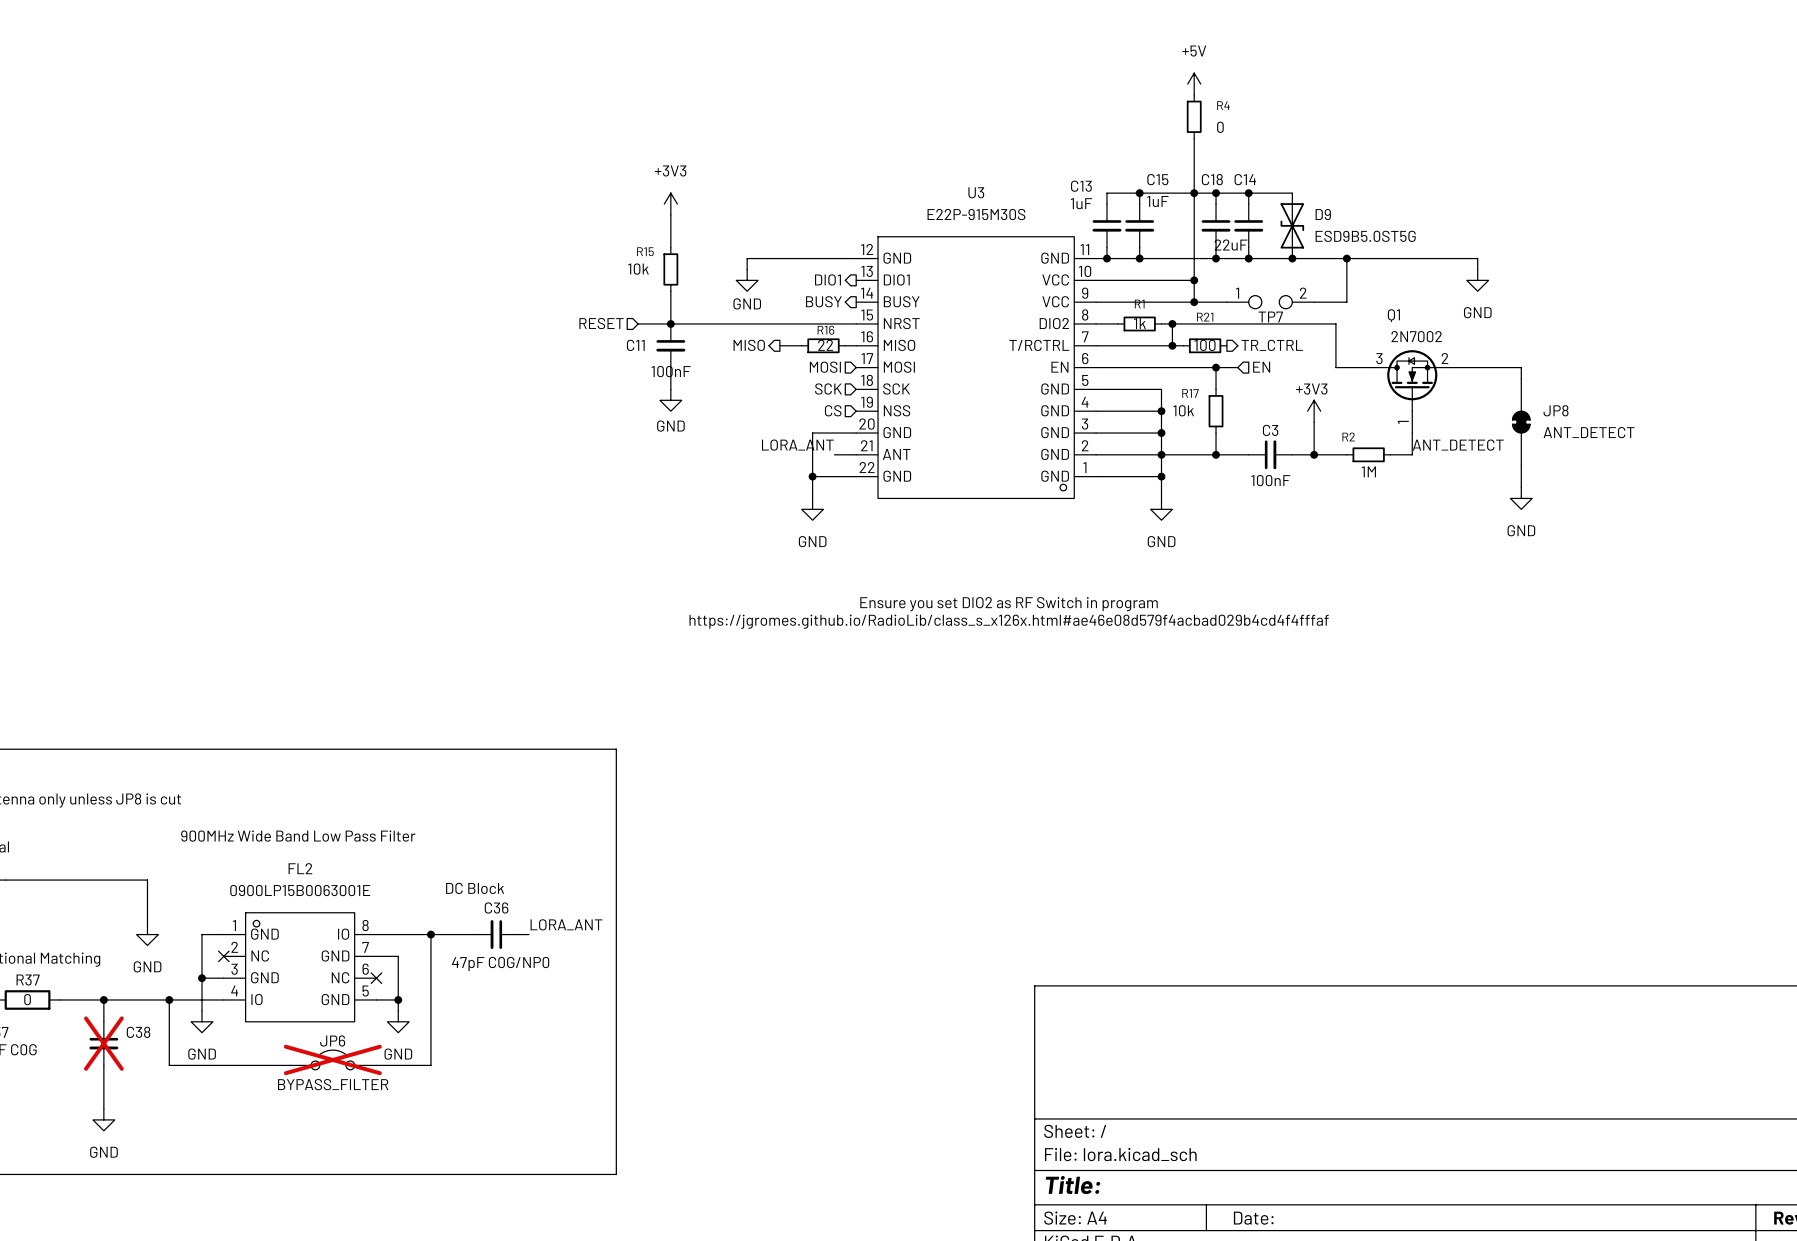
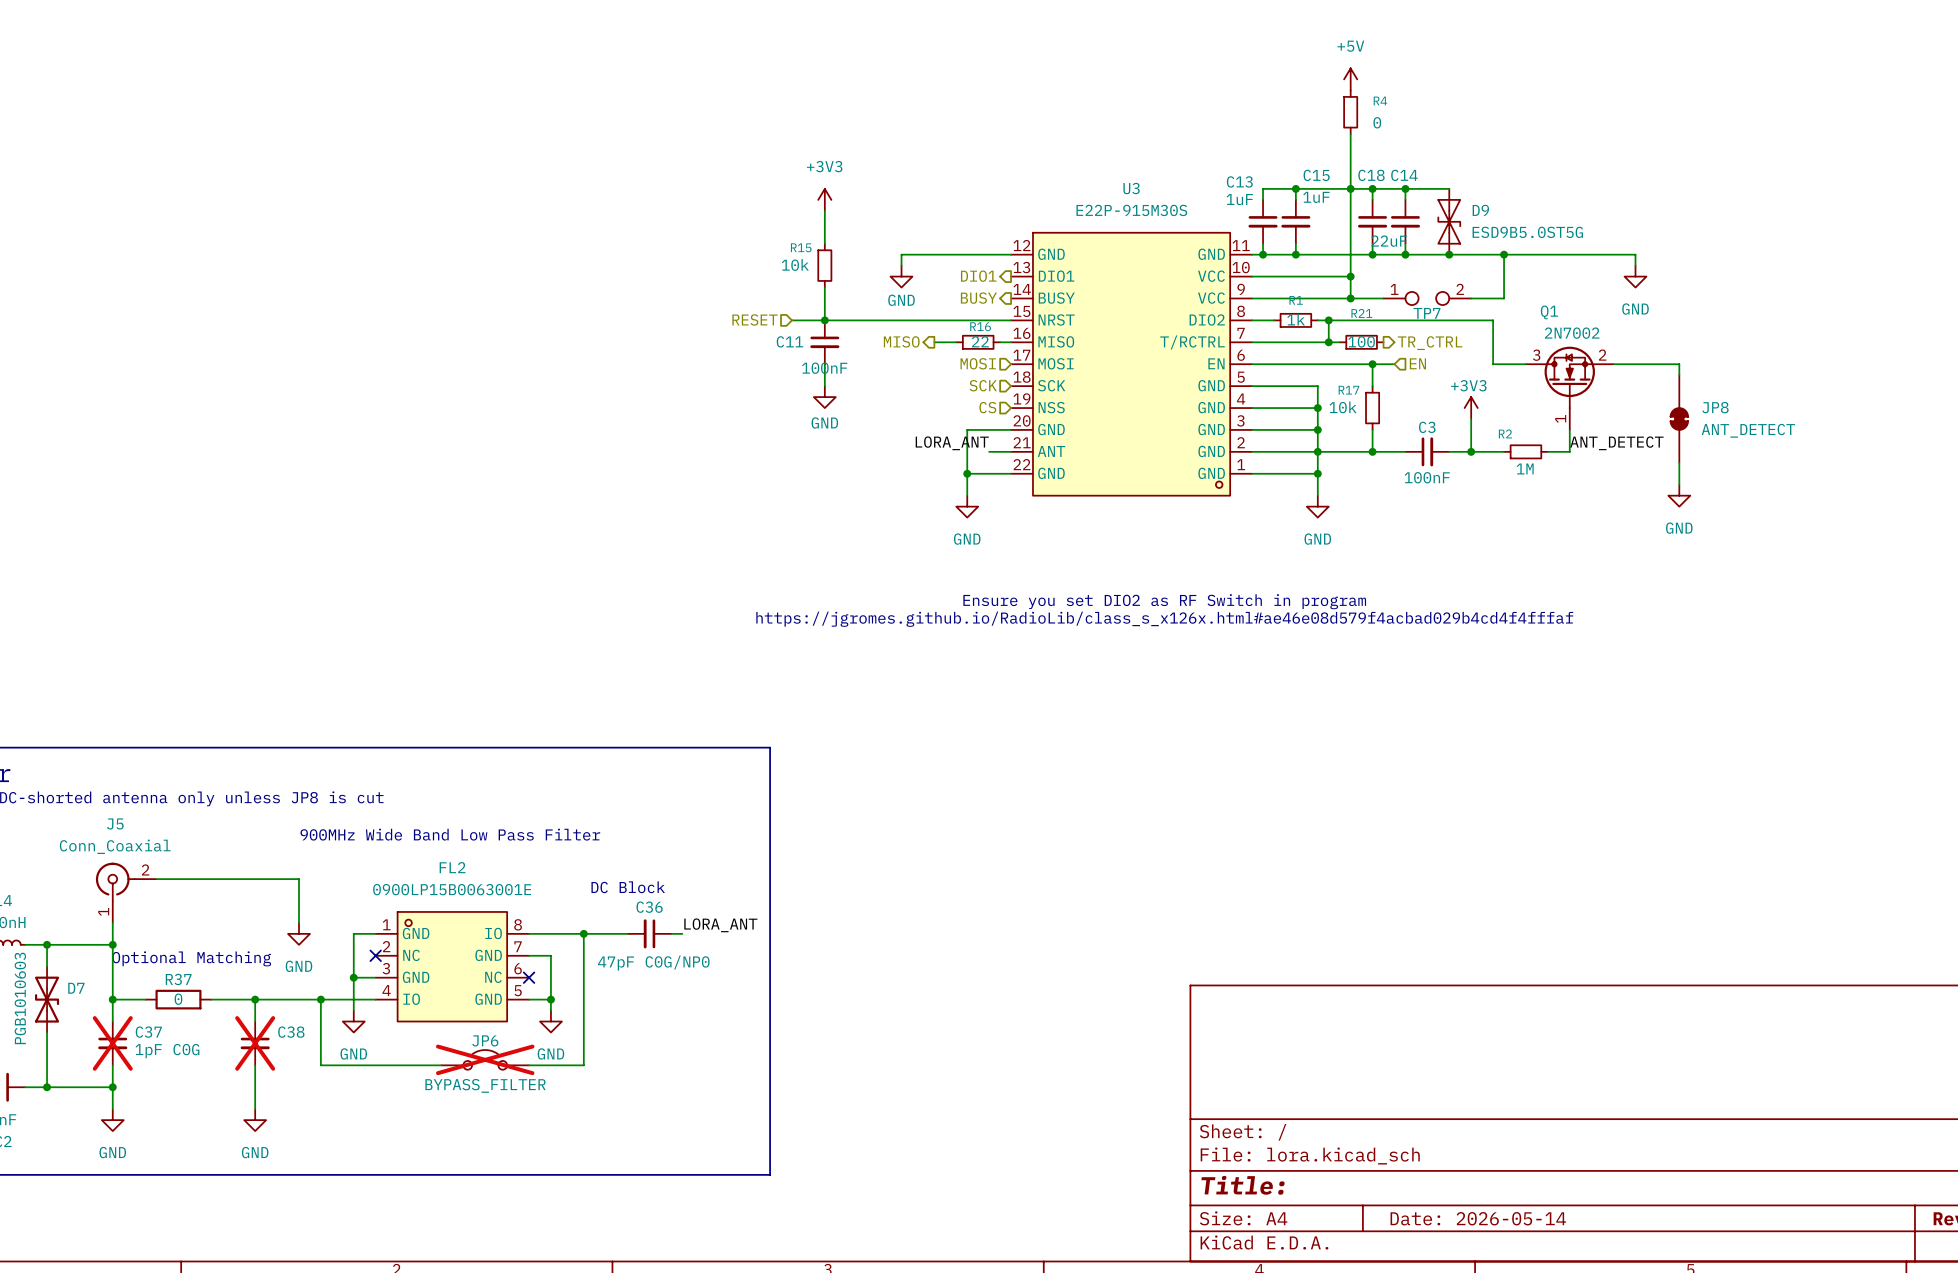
title block: Date: (1253, 1218) -> Date: 2026-05-14 (1478, 1218)

